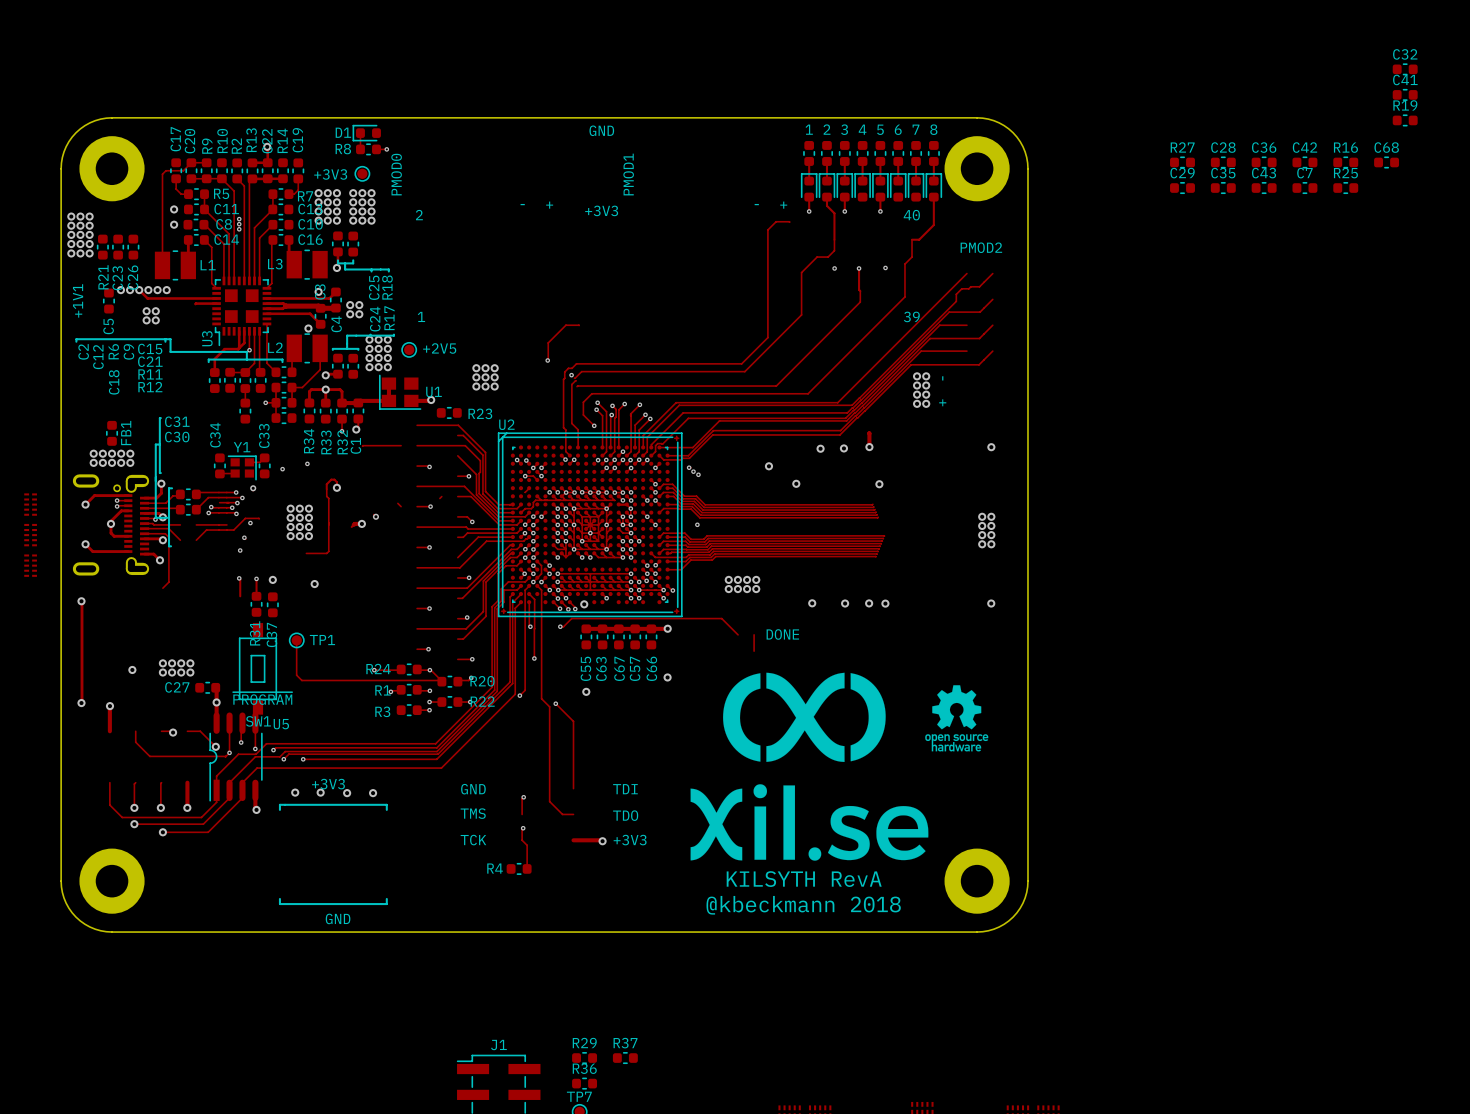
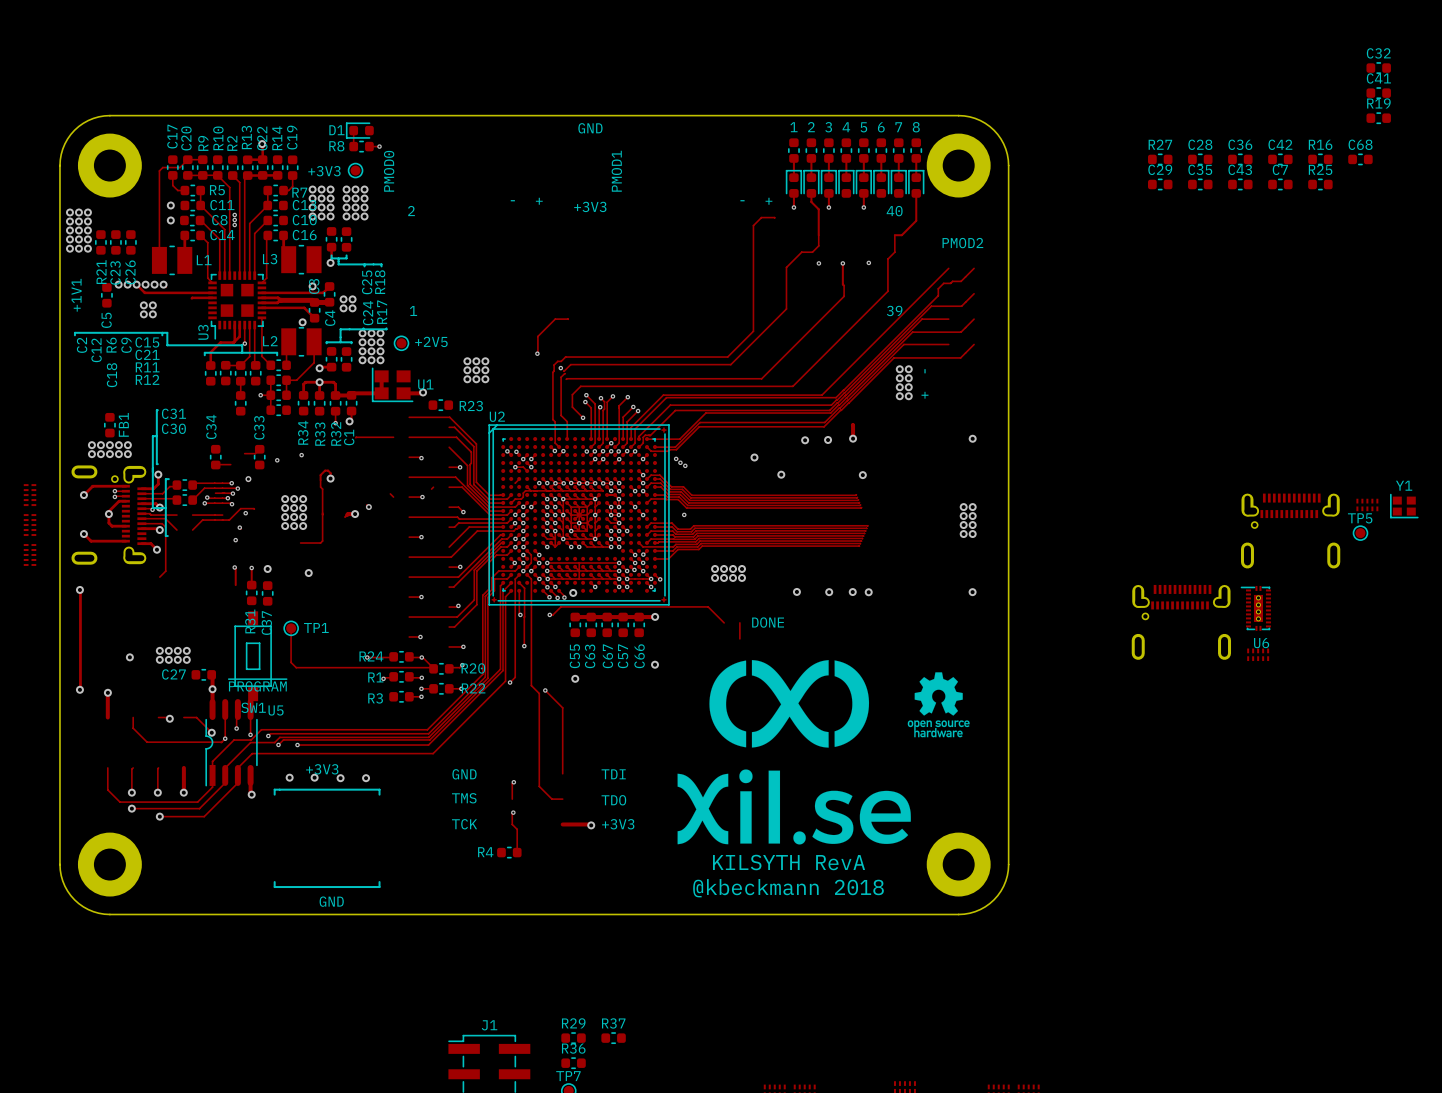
Y1 rotation: 0° (242, 467) -> 180° (1404, 506)
Y1 position: (242, 467) -> (1404, 506)
part: none -> (1367, 504)
part: none -> (1290, 531)
TP5: none -> (1360, 533)
U6: none -> (1255, 608)
part: none -> (1181, 622)
part: none -> (1258, 654)

